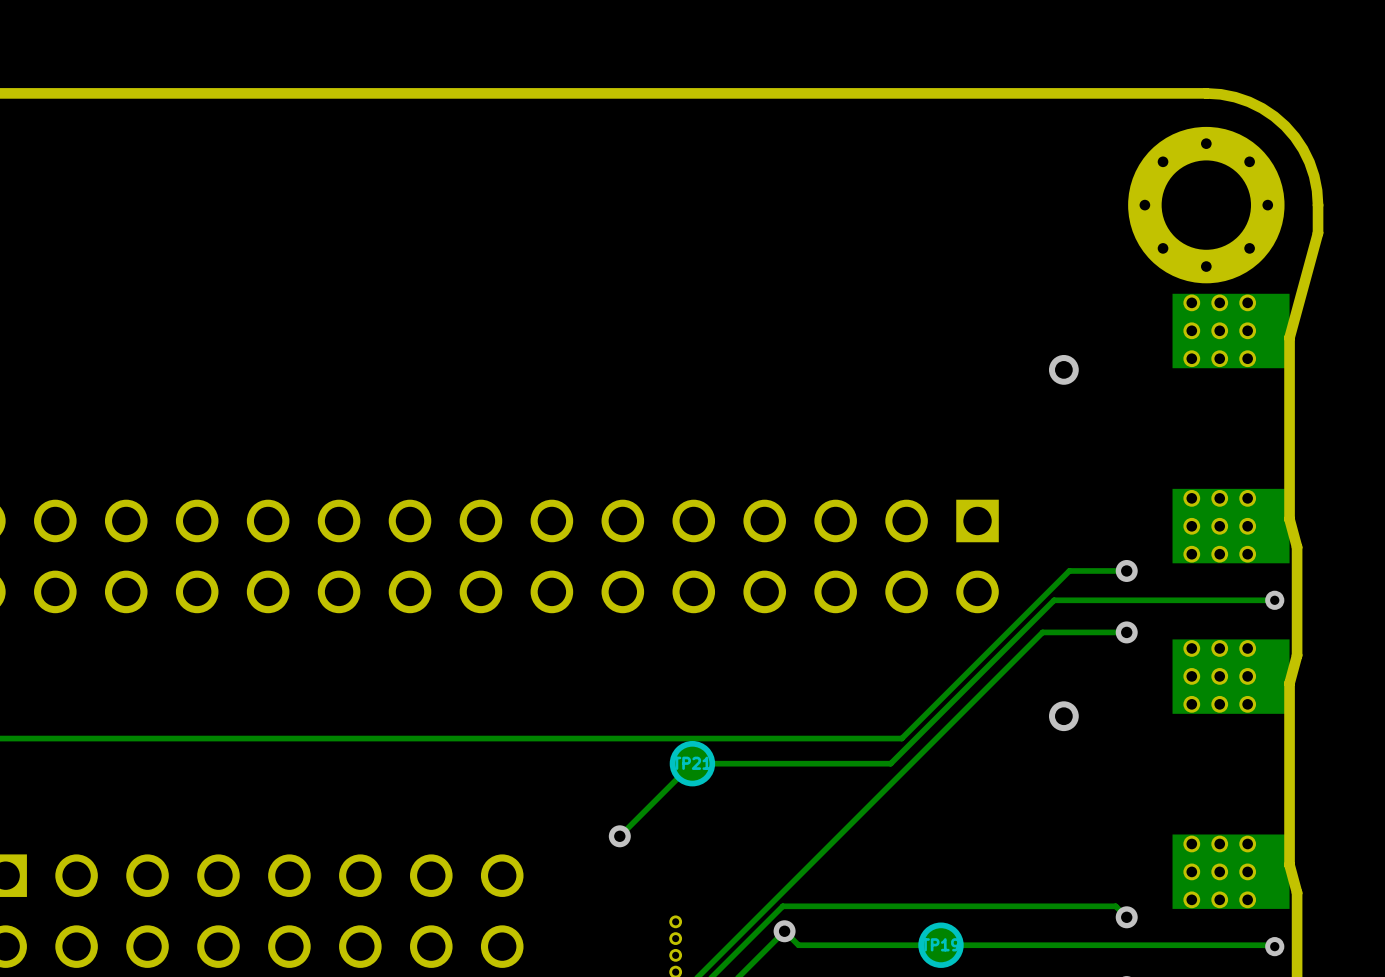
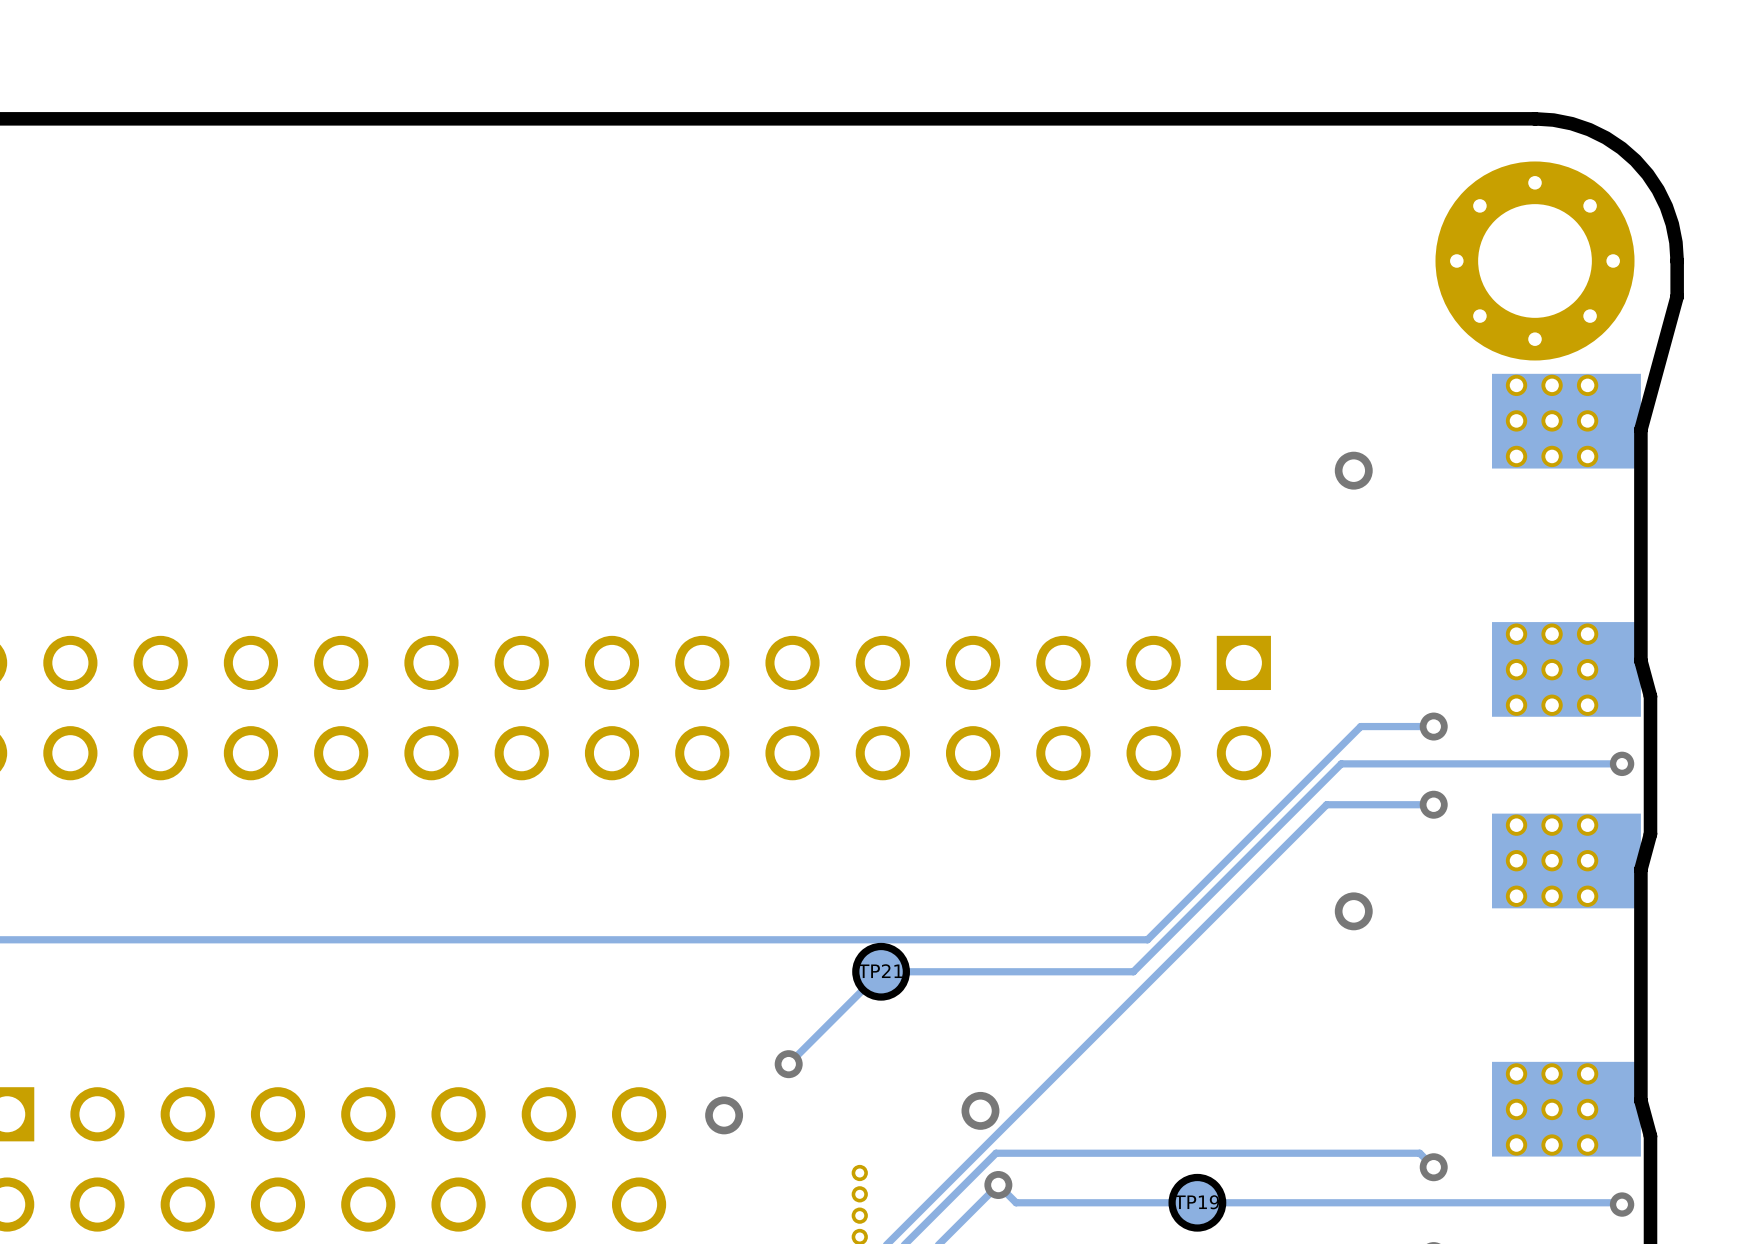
via: none -> (980, 1110)
via: none -> (724, 1115)

